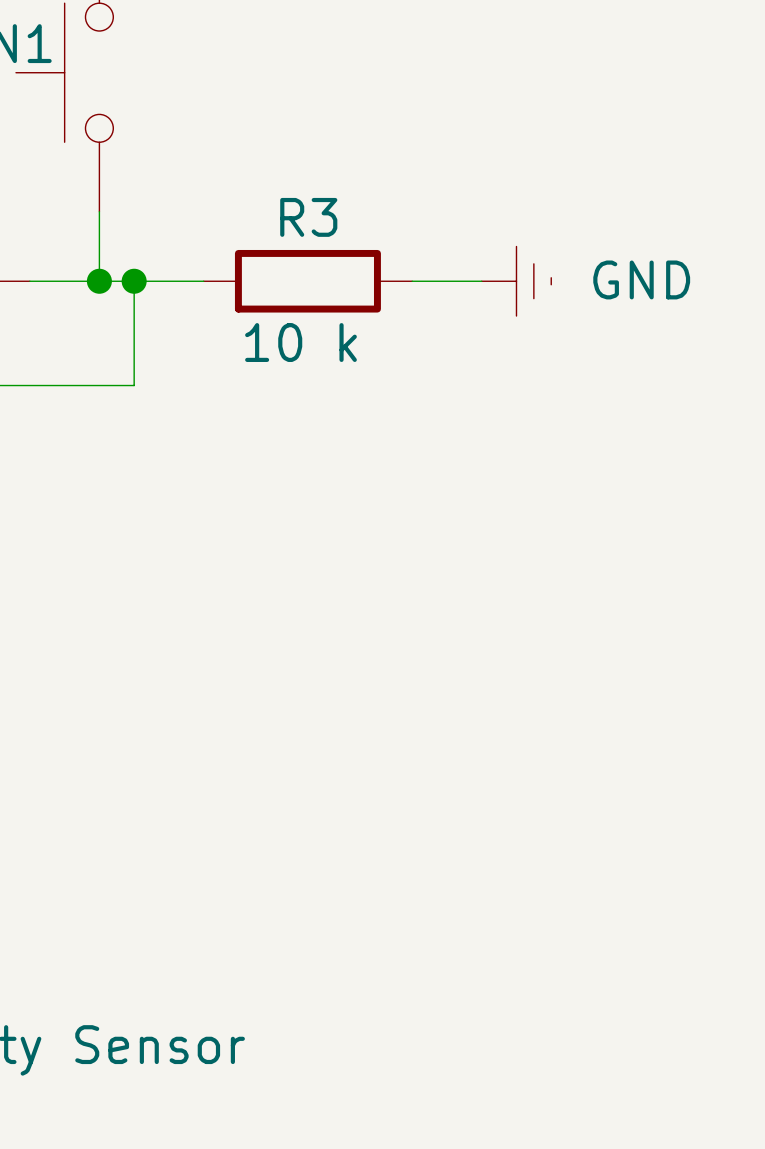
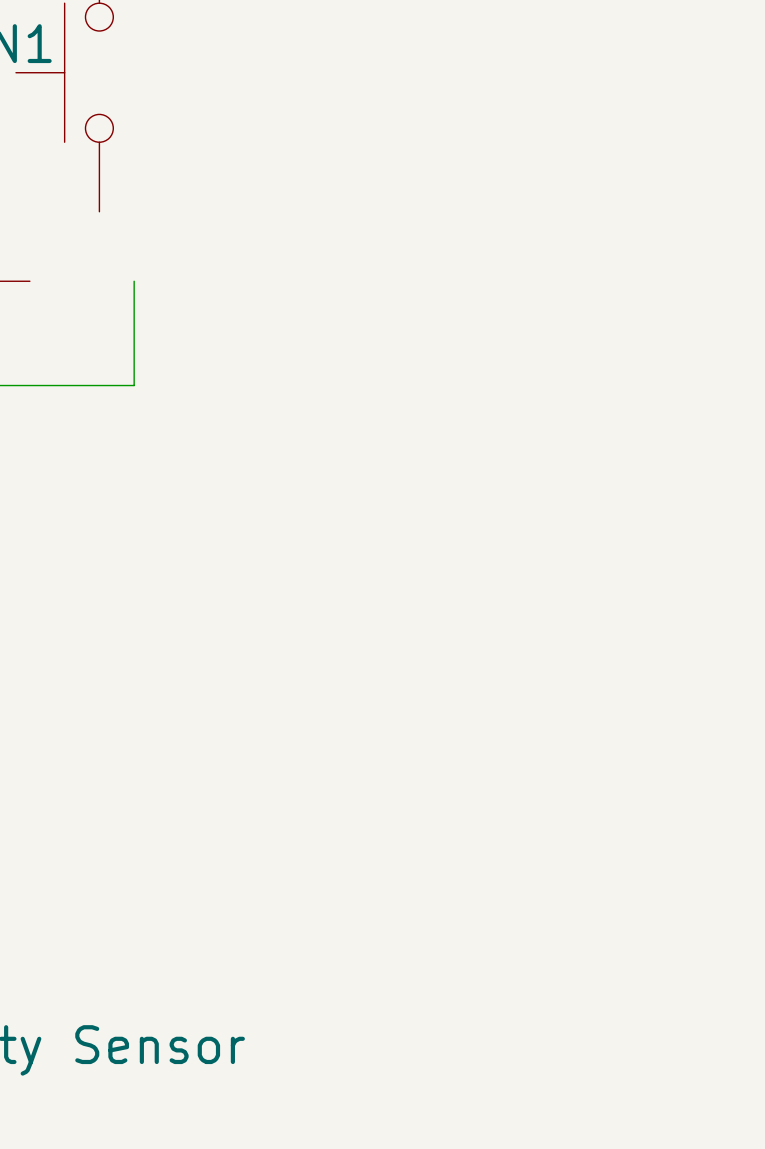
wire: (99, 211) (99, 281) -> none
wire: (29, 281) (203, 281) -> none
junction: (99, 281) -> none
junction: (134, 281) -> none
R3: 10 k (307, 281) -> none
wire: (412, 281) (481, 281) -> none
power symbol: GND (516, 281) -> none

